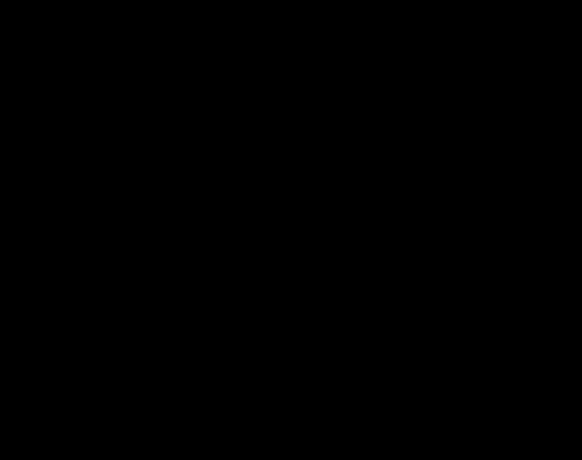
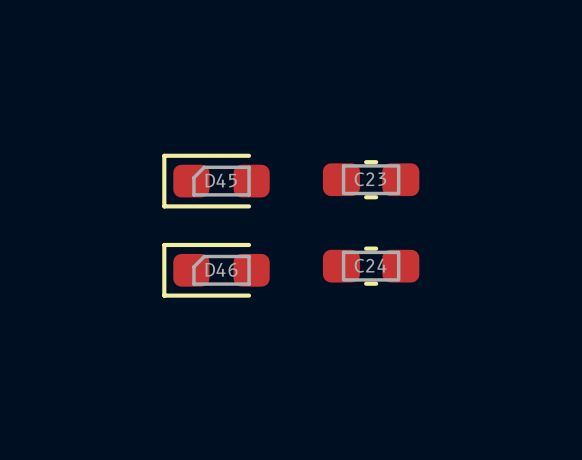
C23: none -> (371, 179)
D45: none -> (215, 181)
C24: none -> (371, 266)
D46: none -> (215, 270)

